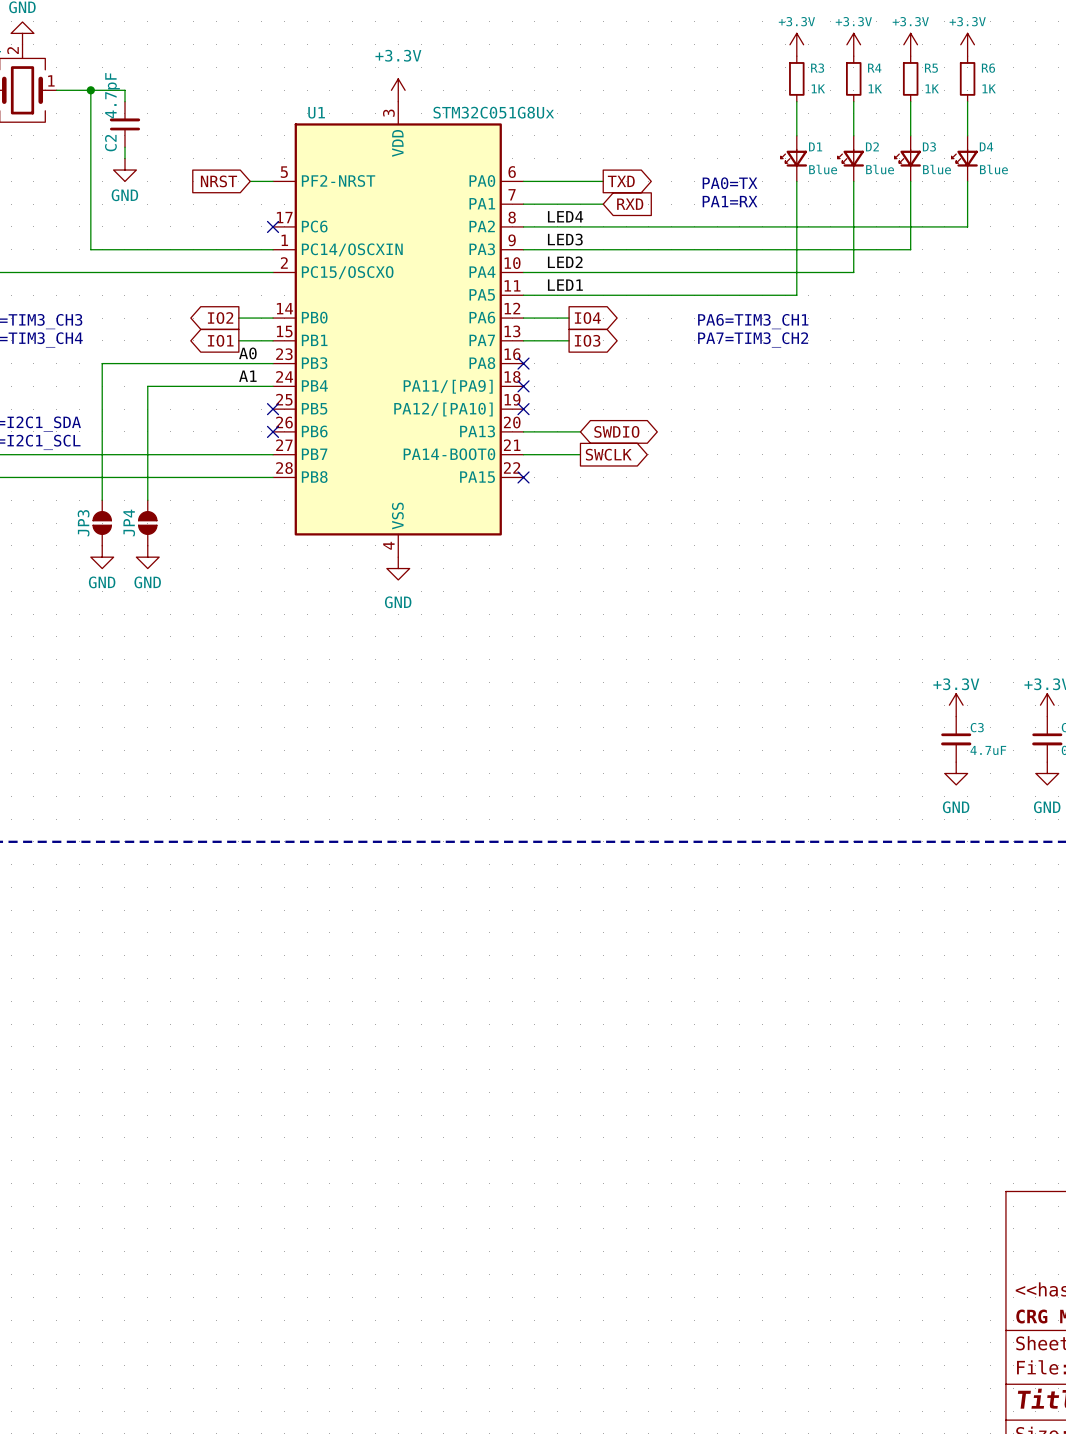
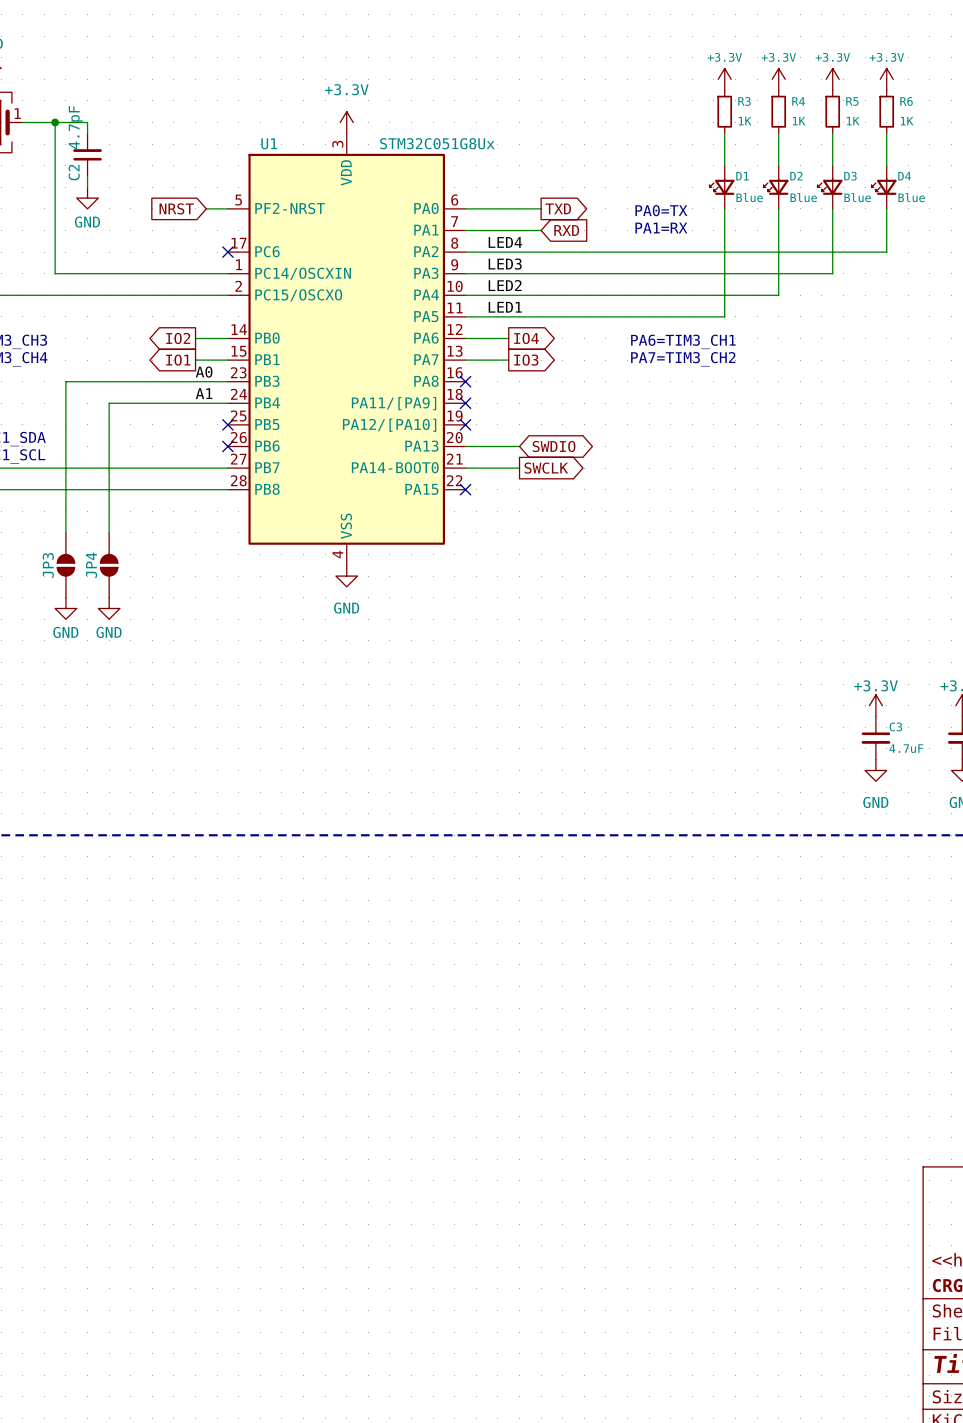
JP3 symbol: [93, 500, 112, 546] -> [57, 532, 75, 598]
JP4 symbol: [138, 500, 157, 546] -> [100, 532, 118, 598]
power symbol: GND (102, 557) -> none
power symbol: GND (147, 557) -> none
power symbol: none -> GND (65, 608)
power symbol: none -> GND (109, 608)

